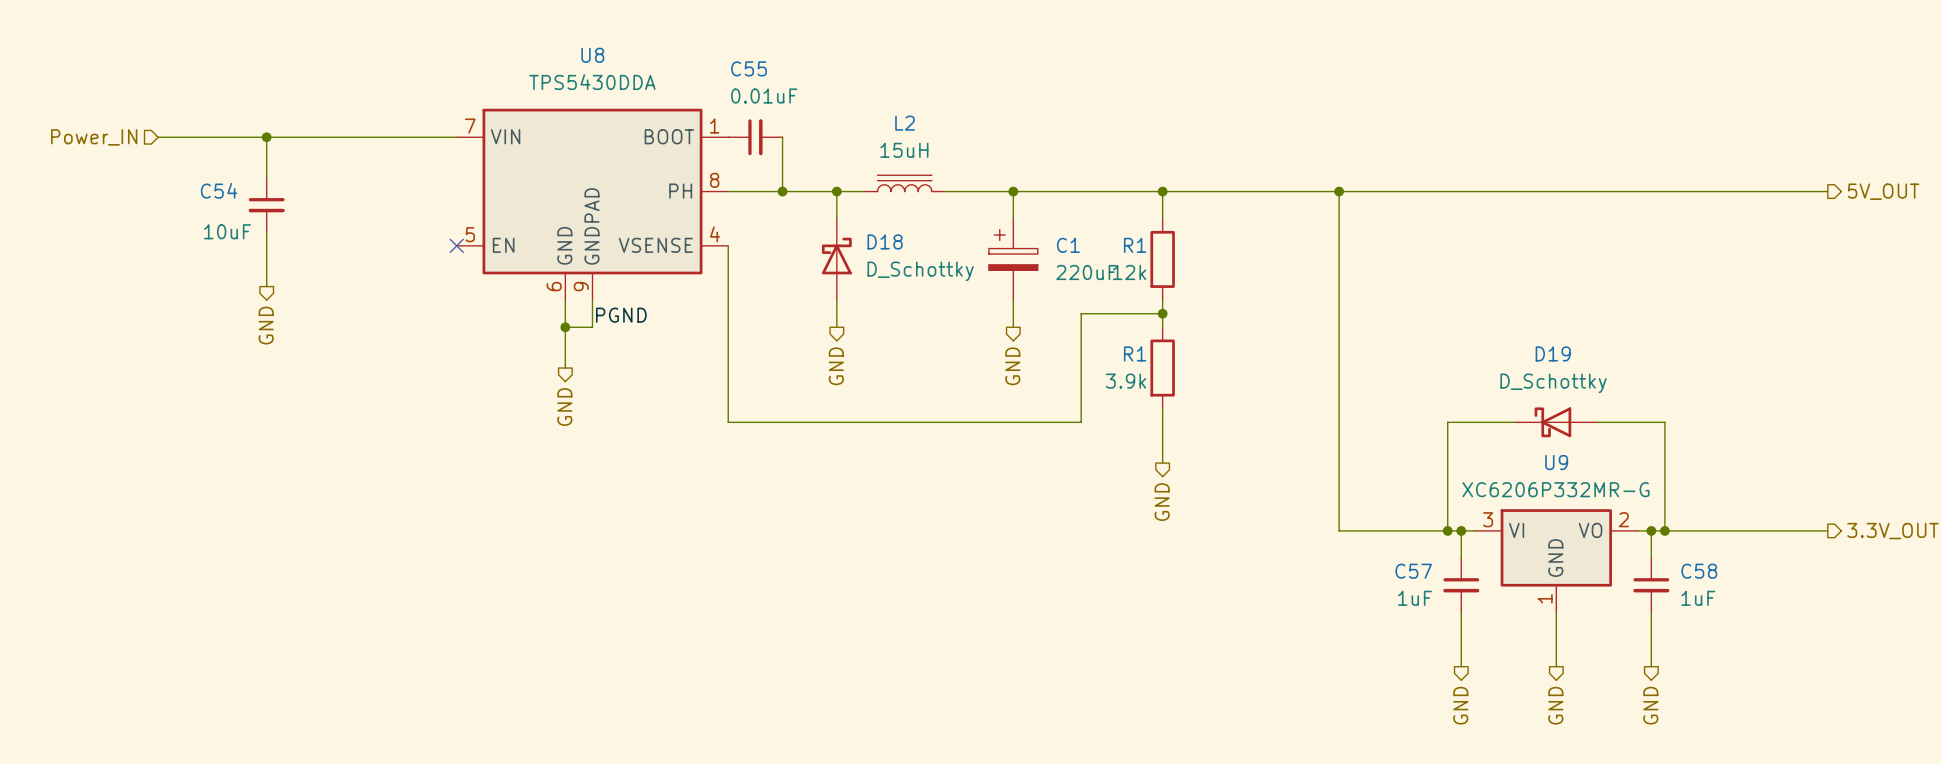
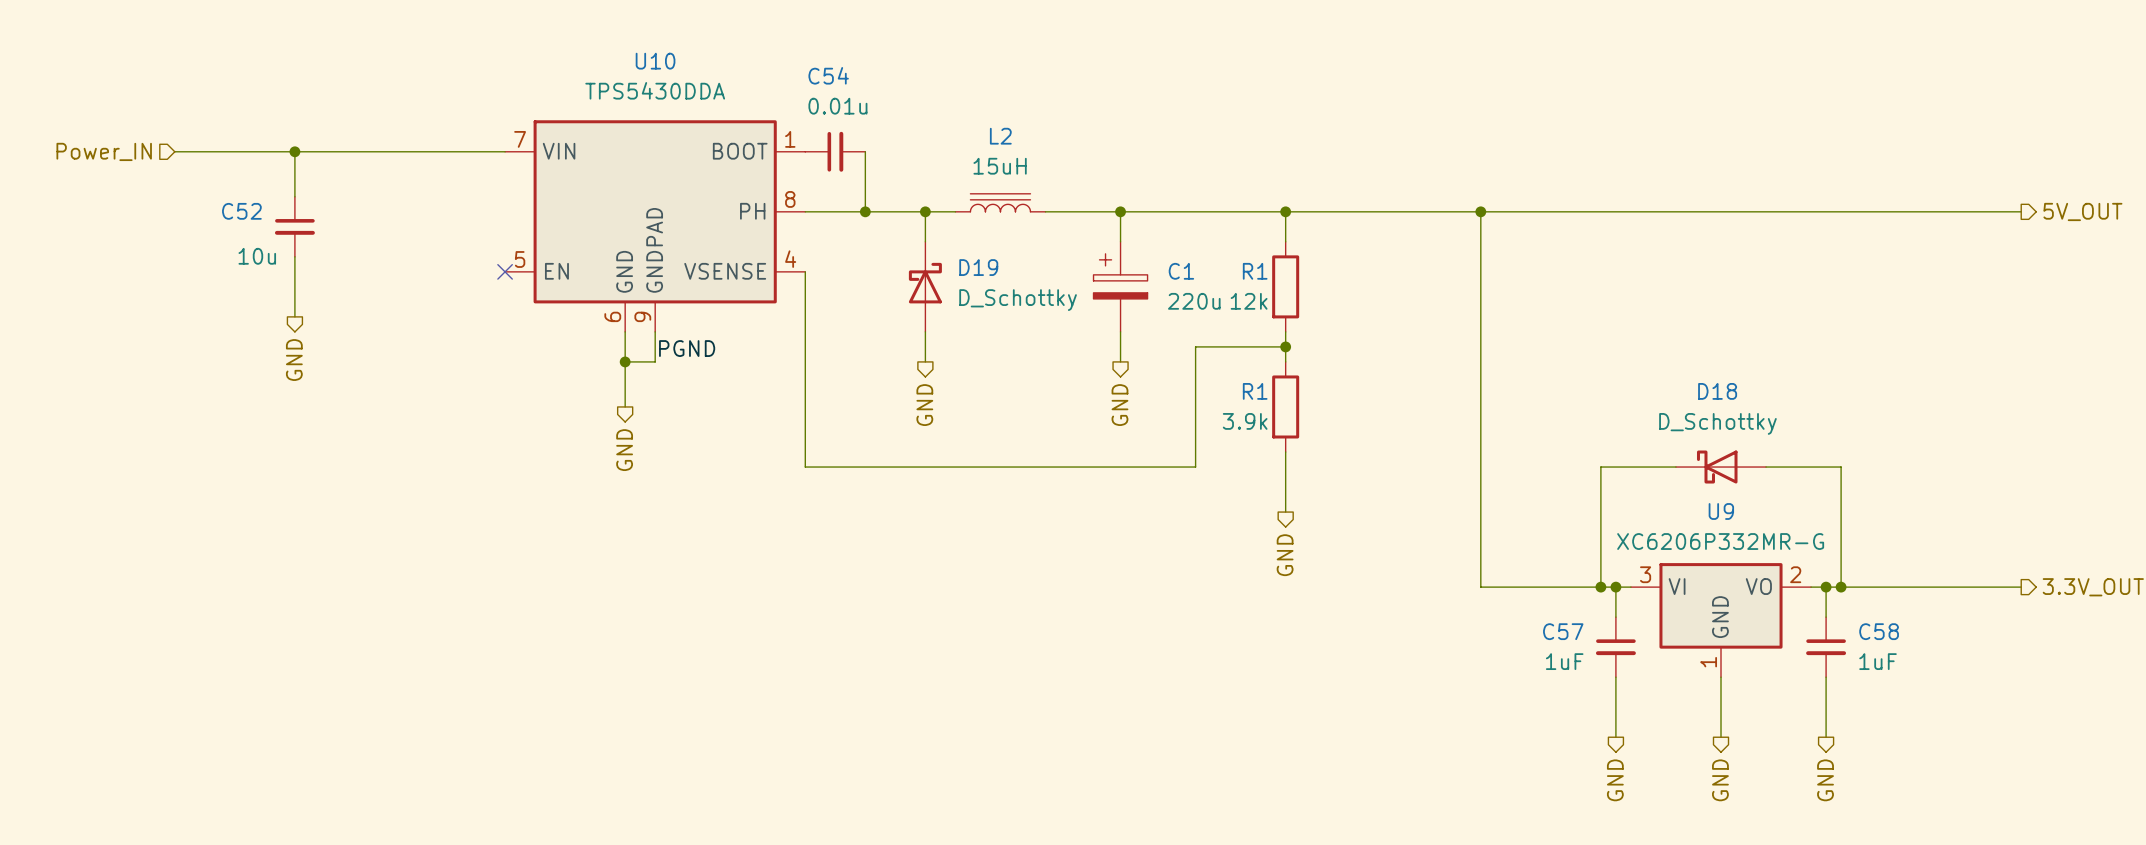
U8 name: U8 (592, 55) -> U10 (655, 61)
C55 name: C55 (749, 68) -> C54 (828, 75)
C55 value: 0.01uF (764, 96) -> 0.01u (837, 106)
C54 name: C54 (219, 190) -> C52 (241, 211)
C54 value: 10uF (227, 231) -> 10u (257, 256)
D18 name: D18 (885, 241) -> D19 (978, 267)
C1 value: 220uF (1086, 272) -> 220u (1194, 301)
D19 name: D19 (1553, 353) -> D18 (1717, 391)

